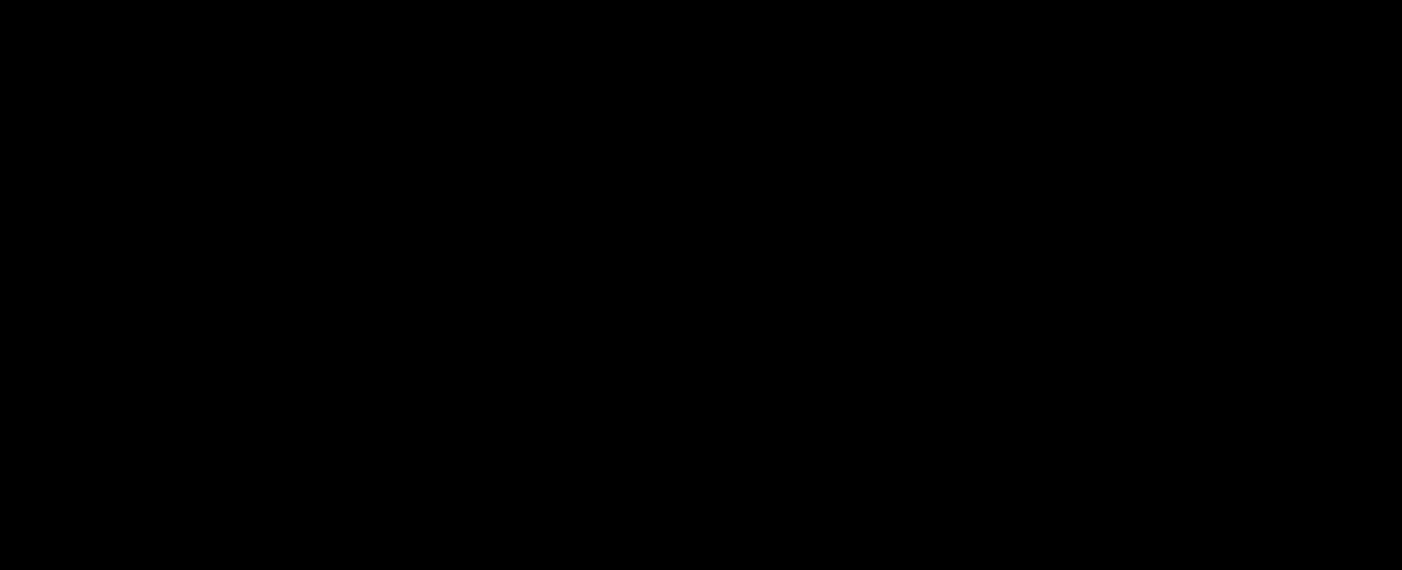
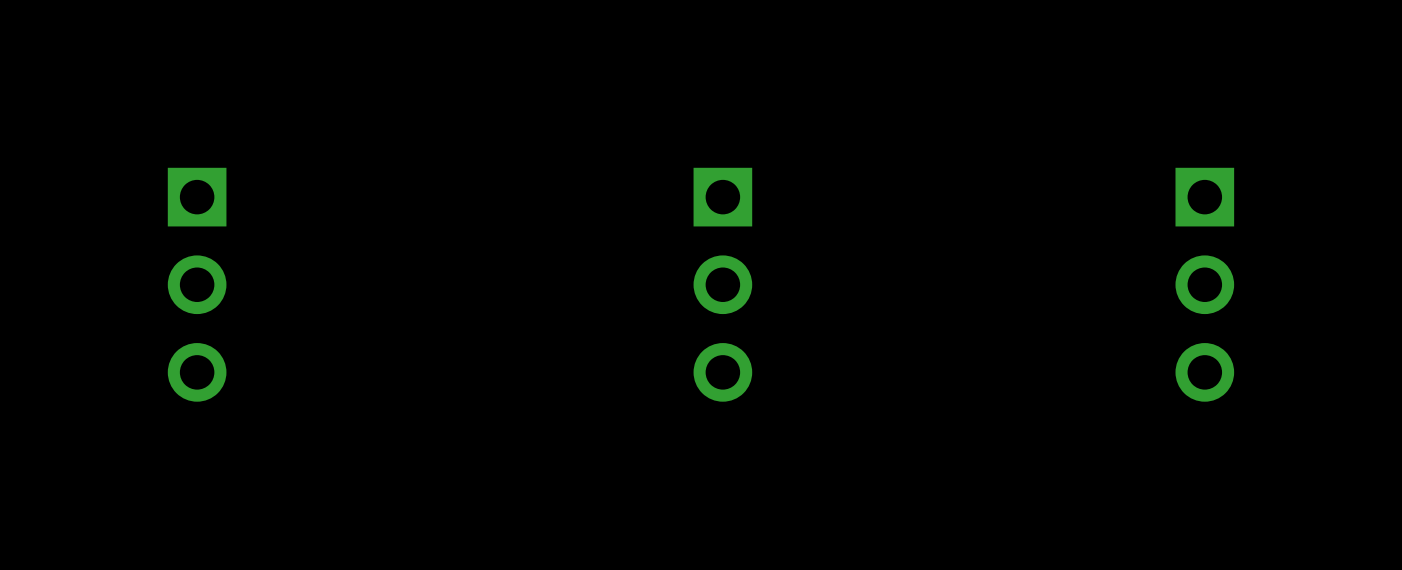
part: none -> (197, 284)
part: none -> (722, 284)
part: none -> (1204, 284)

